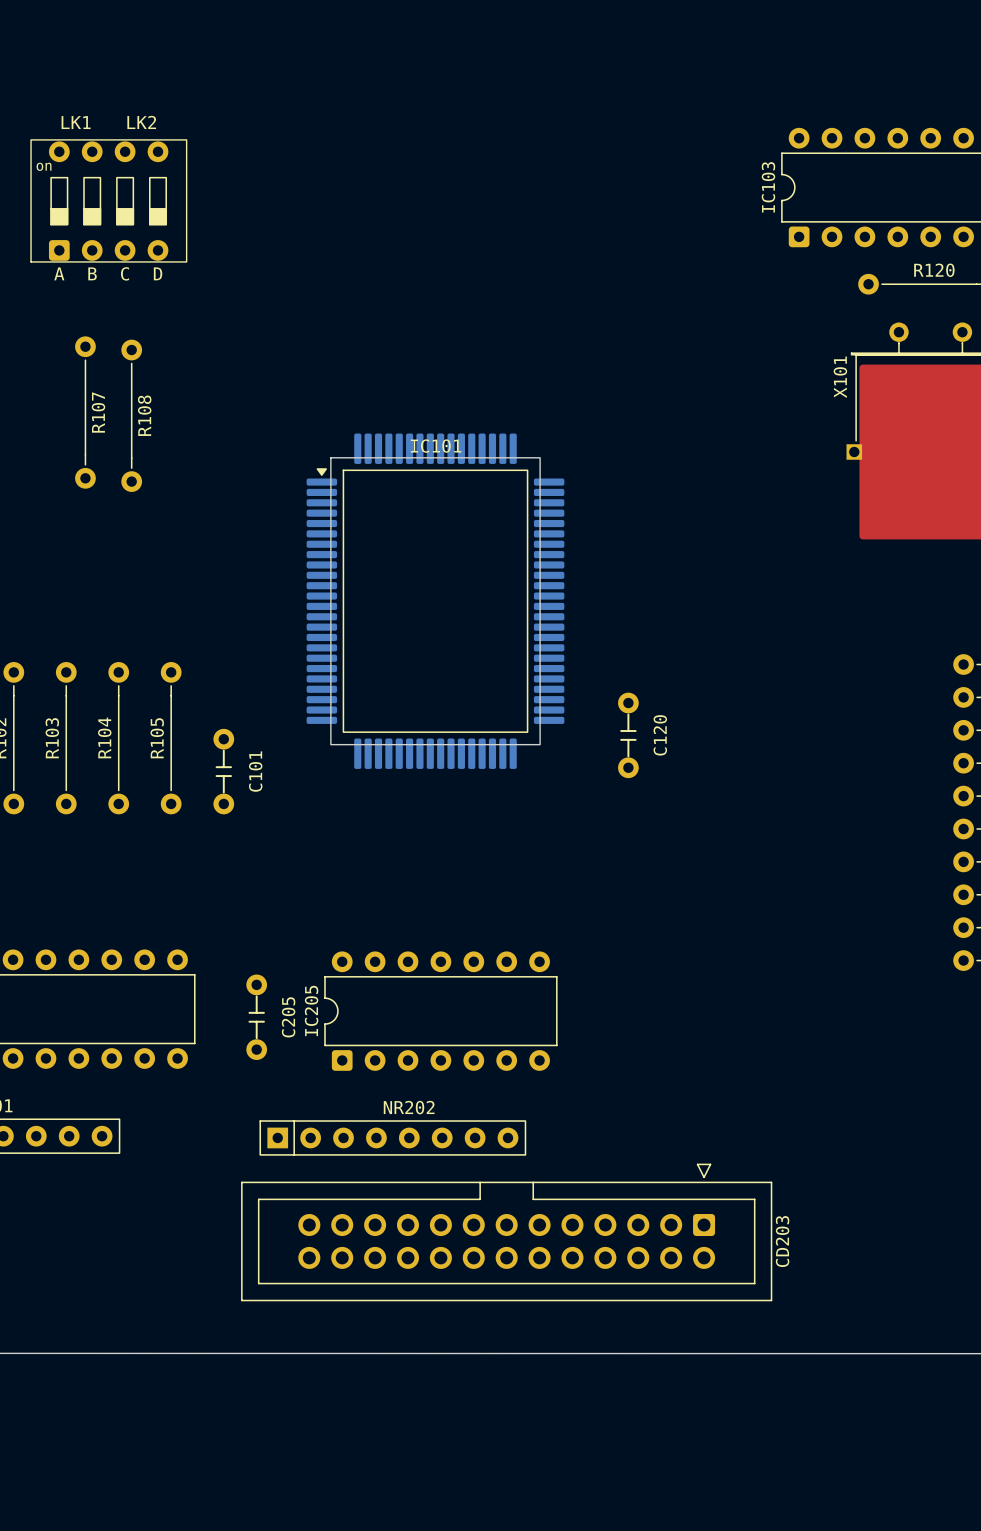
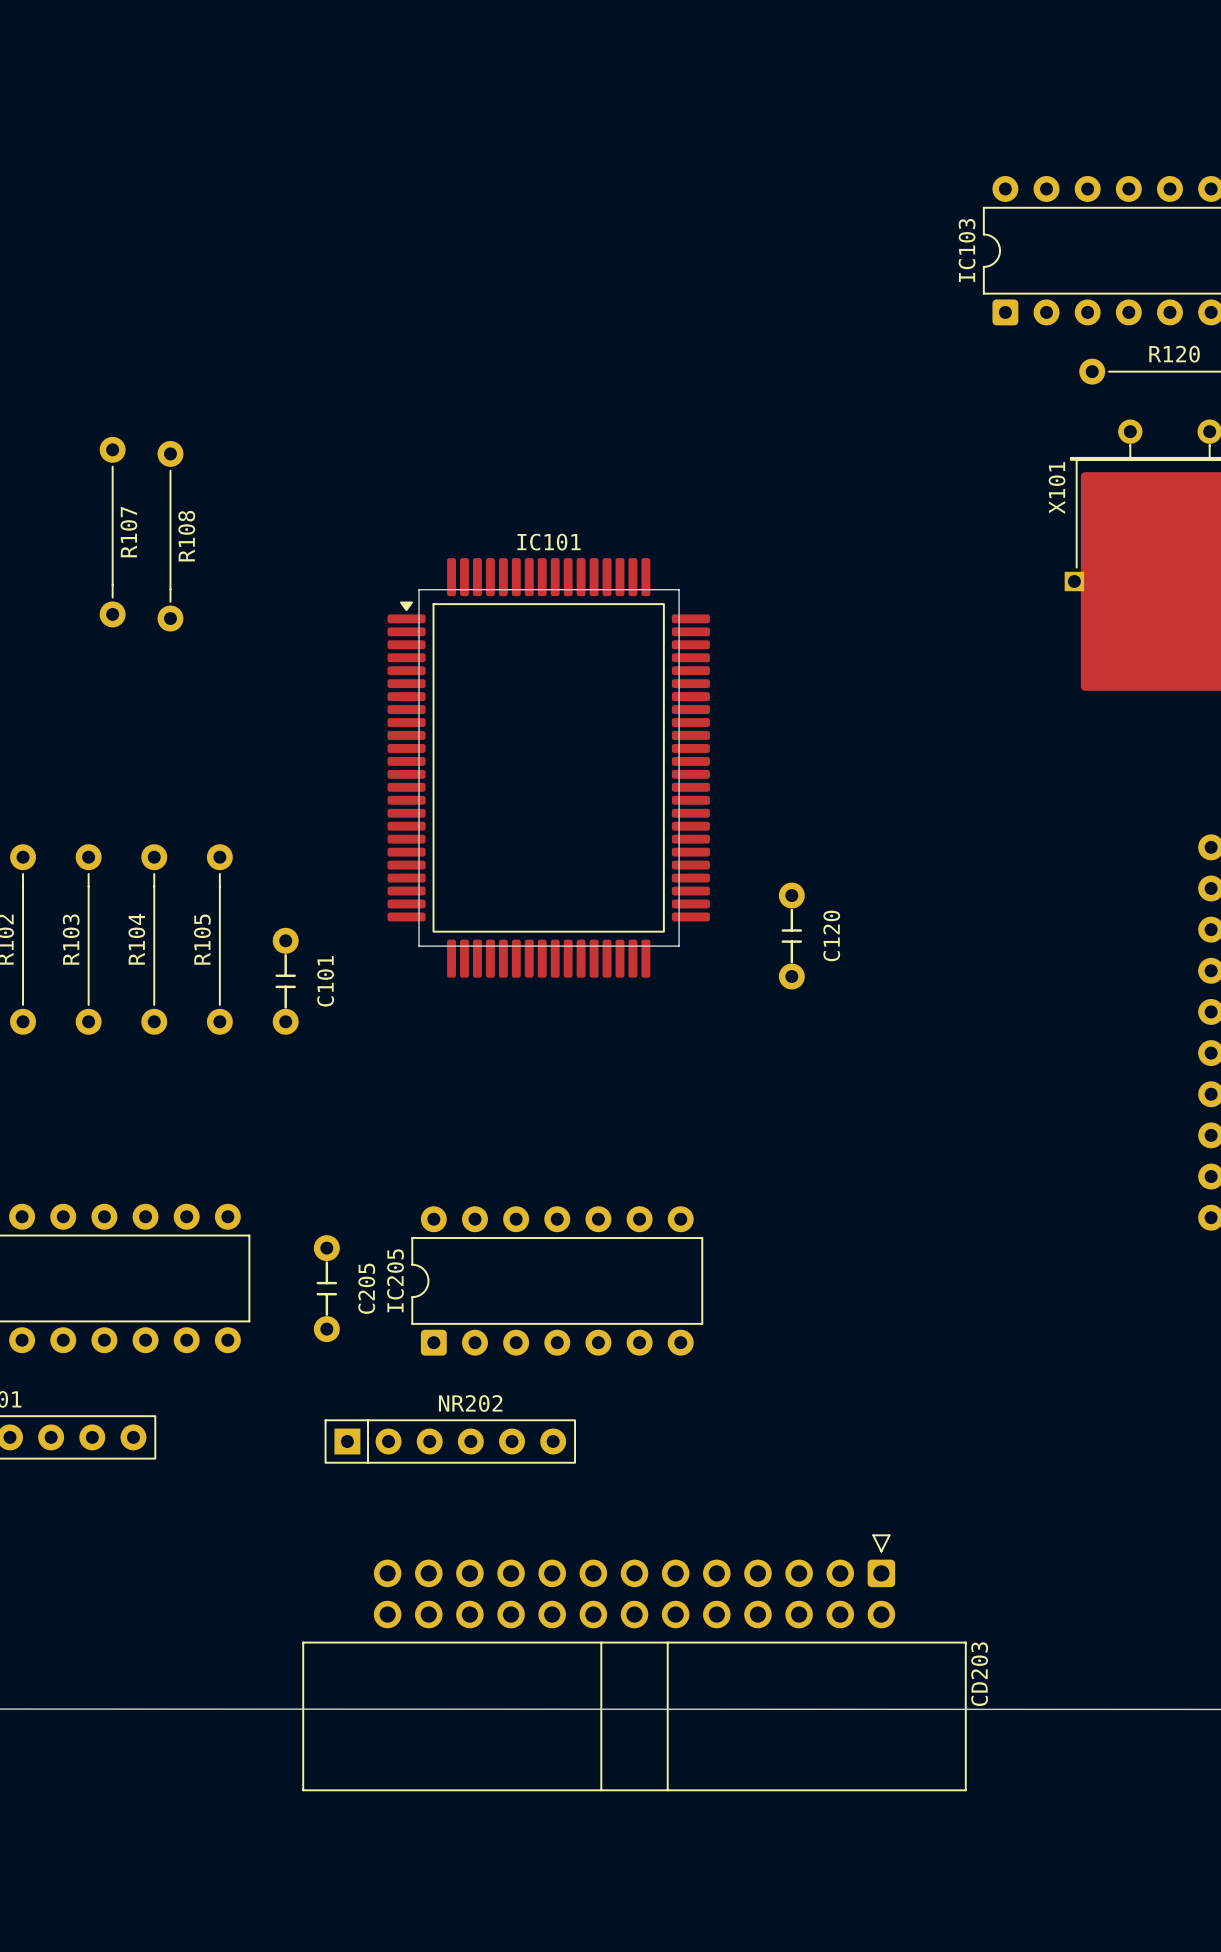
LK1: (108, 200) -> none
IC101 footprint: [306, 433, 565, 769] -> [387, 558, 710, 978]
board edge: none -> (419, 589) (419, 946) (679, 946) (679, 589) (419, 589)
NR202 footprint: [259, 1120, 527, 1156] -> [324, 1419, 577, 1464]
CD203 footprint: [241, 1163, 773, 1302] -> [302, 1534, 967, 1792]

